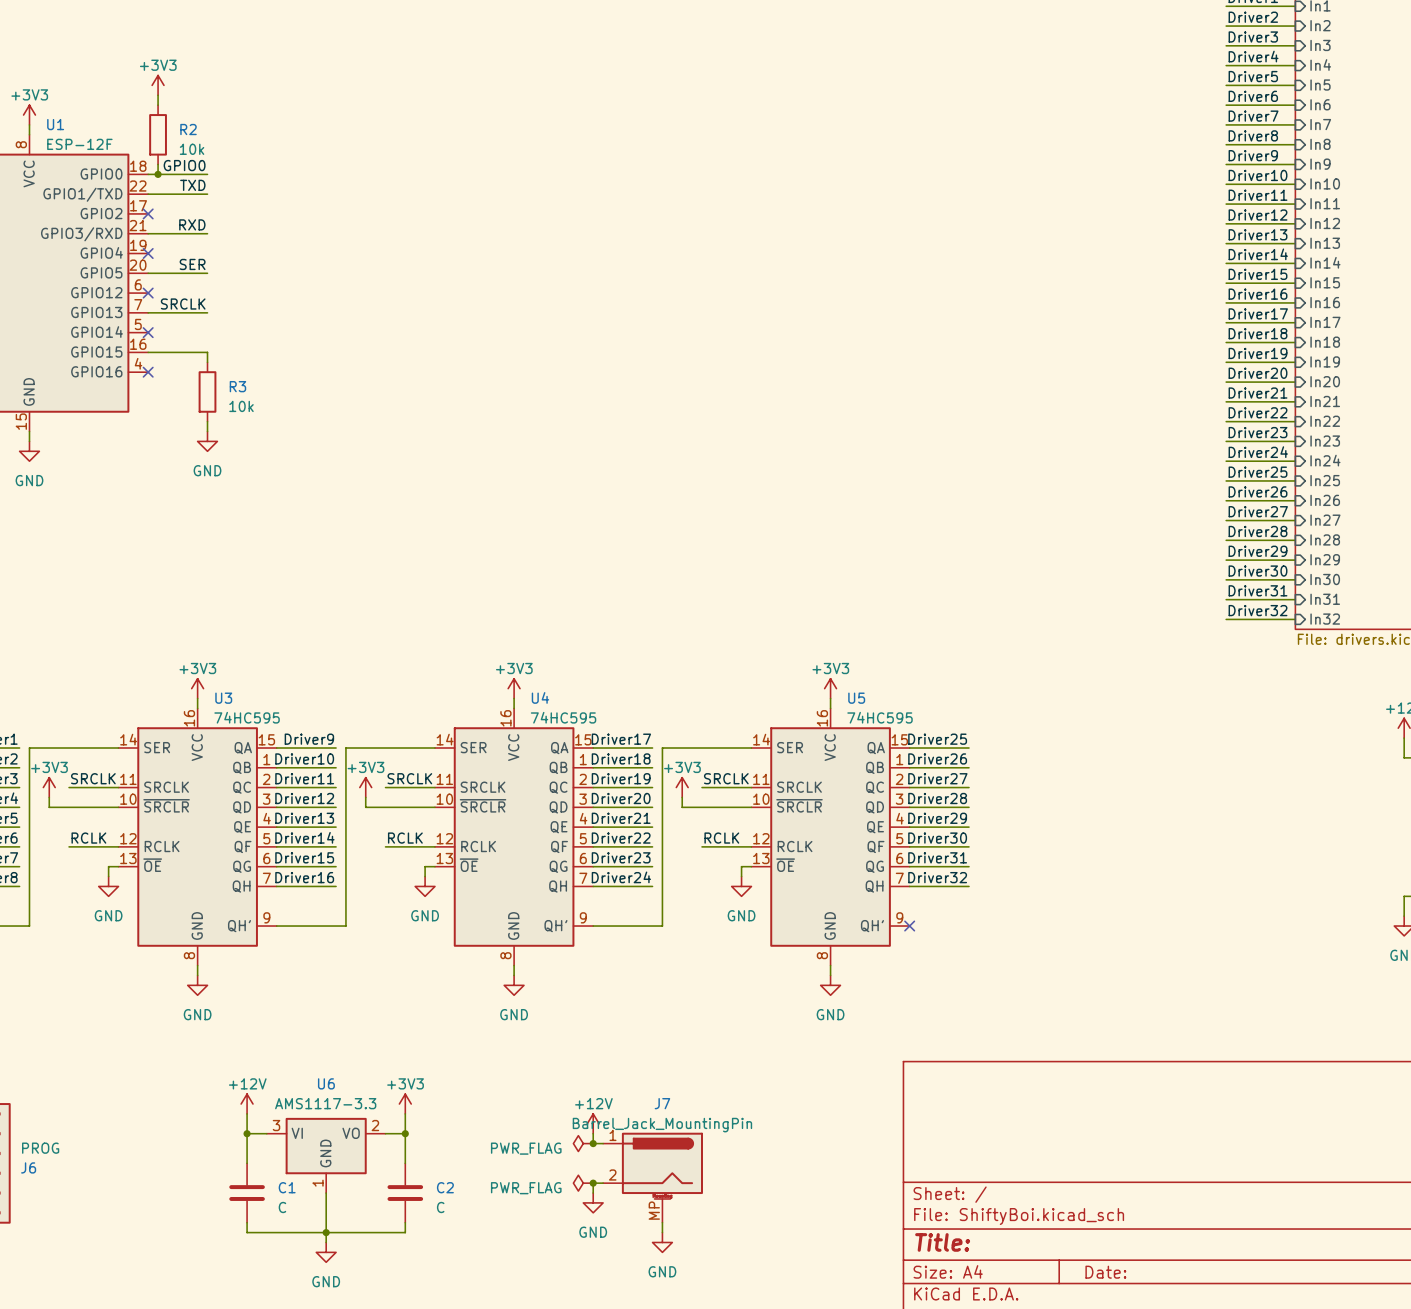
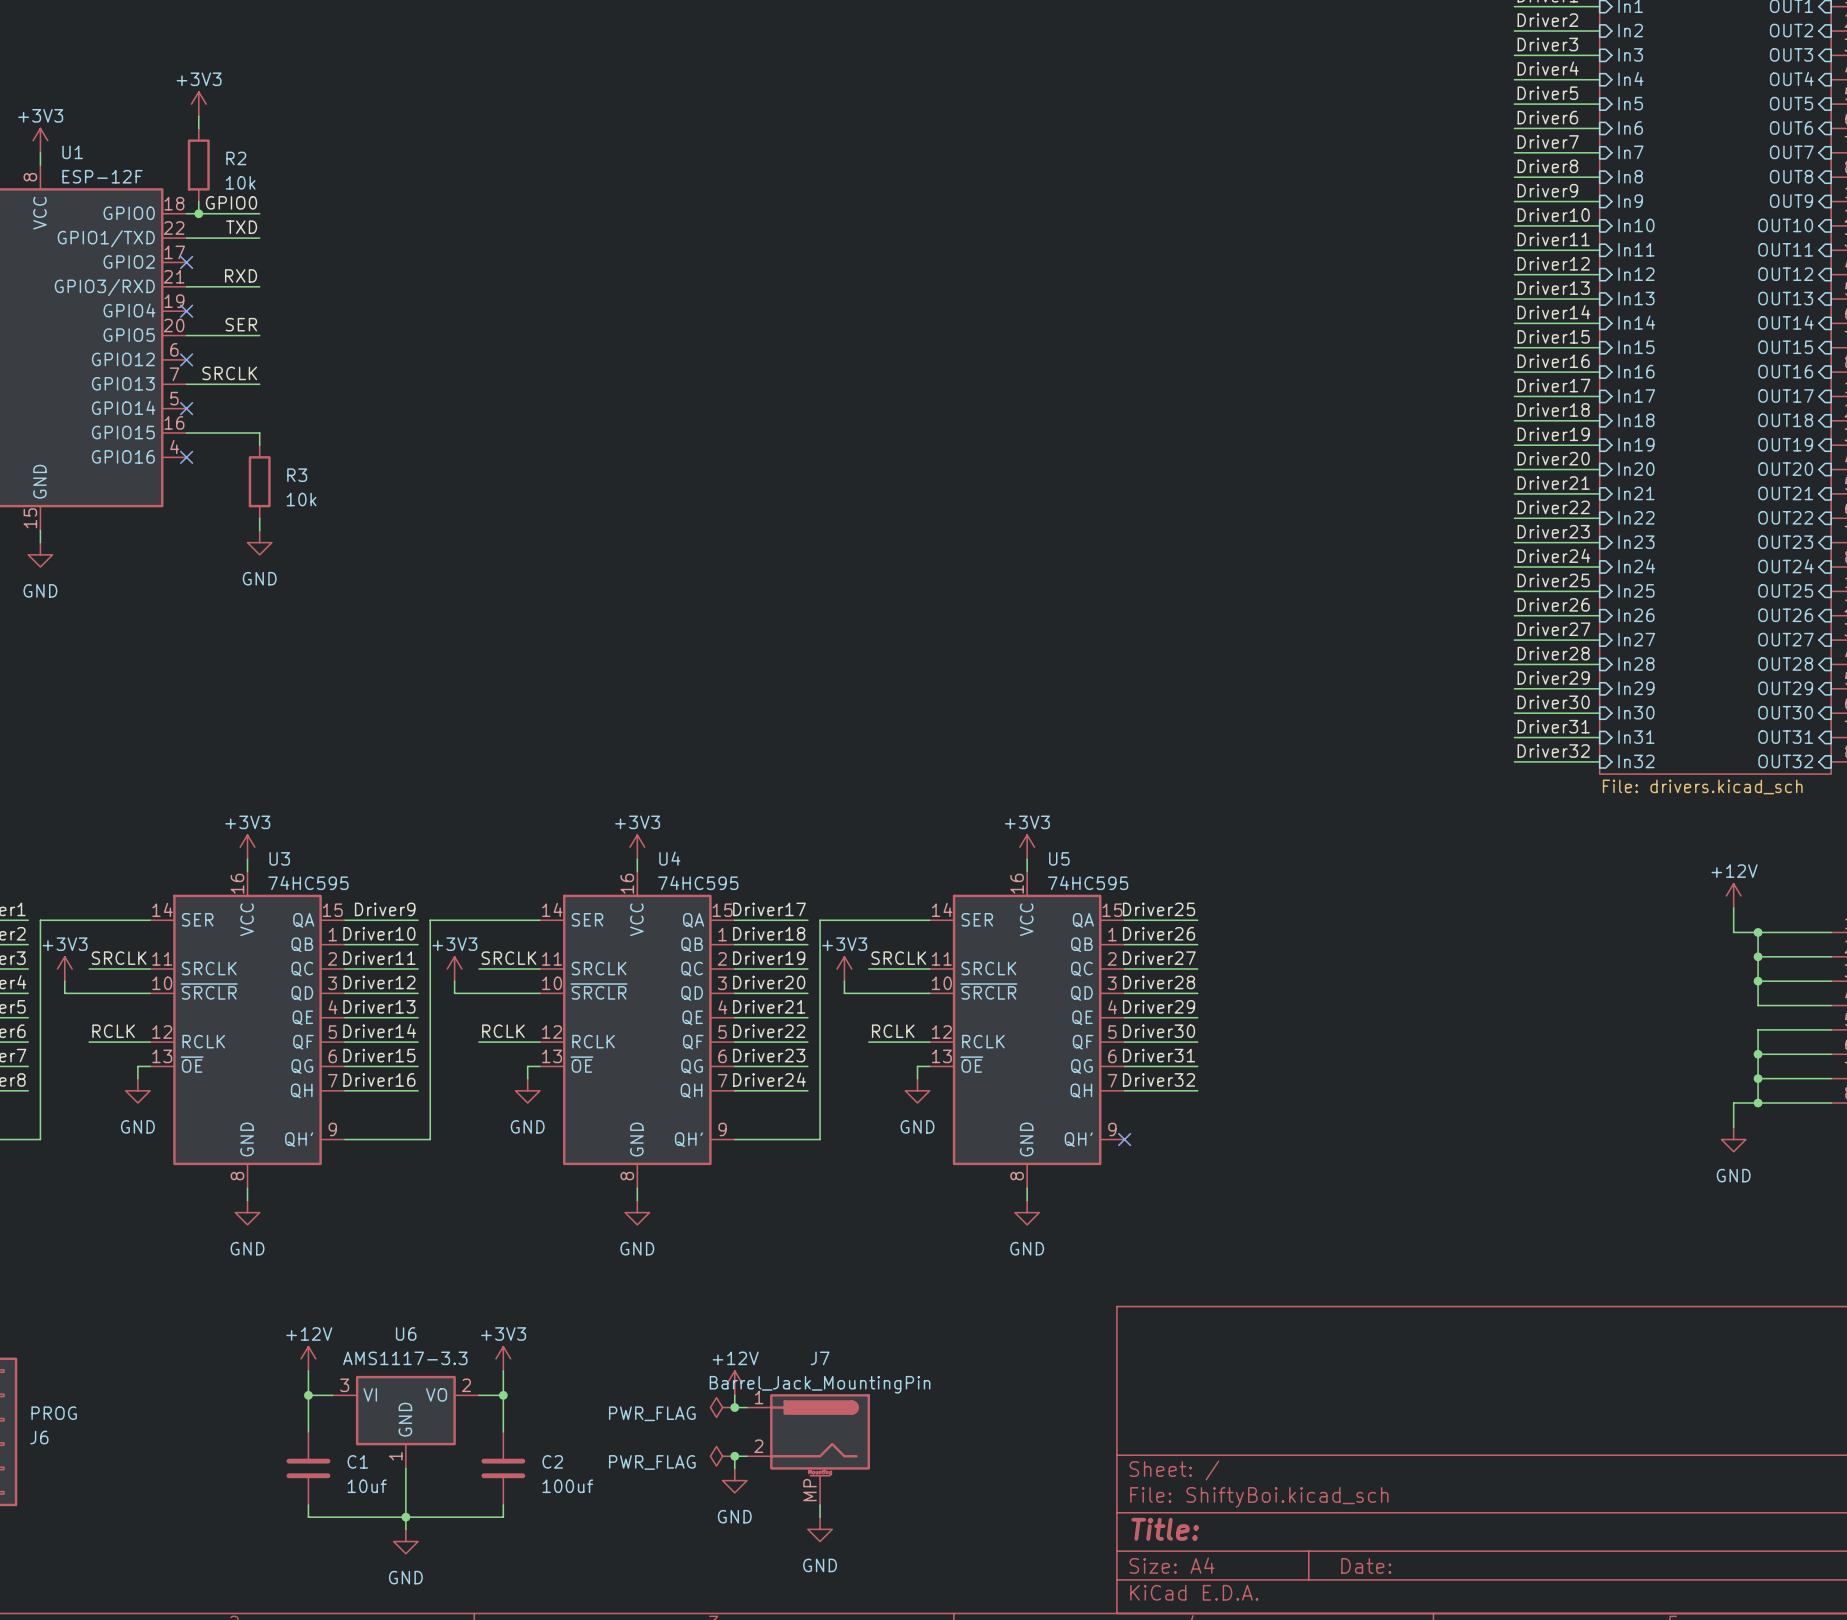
C1 value: C (282, 1207) -> 10uf (367, 1486)
C2 value: C (440, 1207) -> 100uf (567, 1486)

